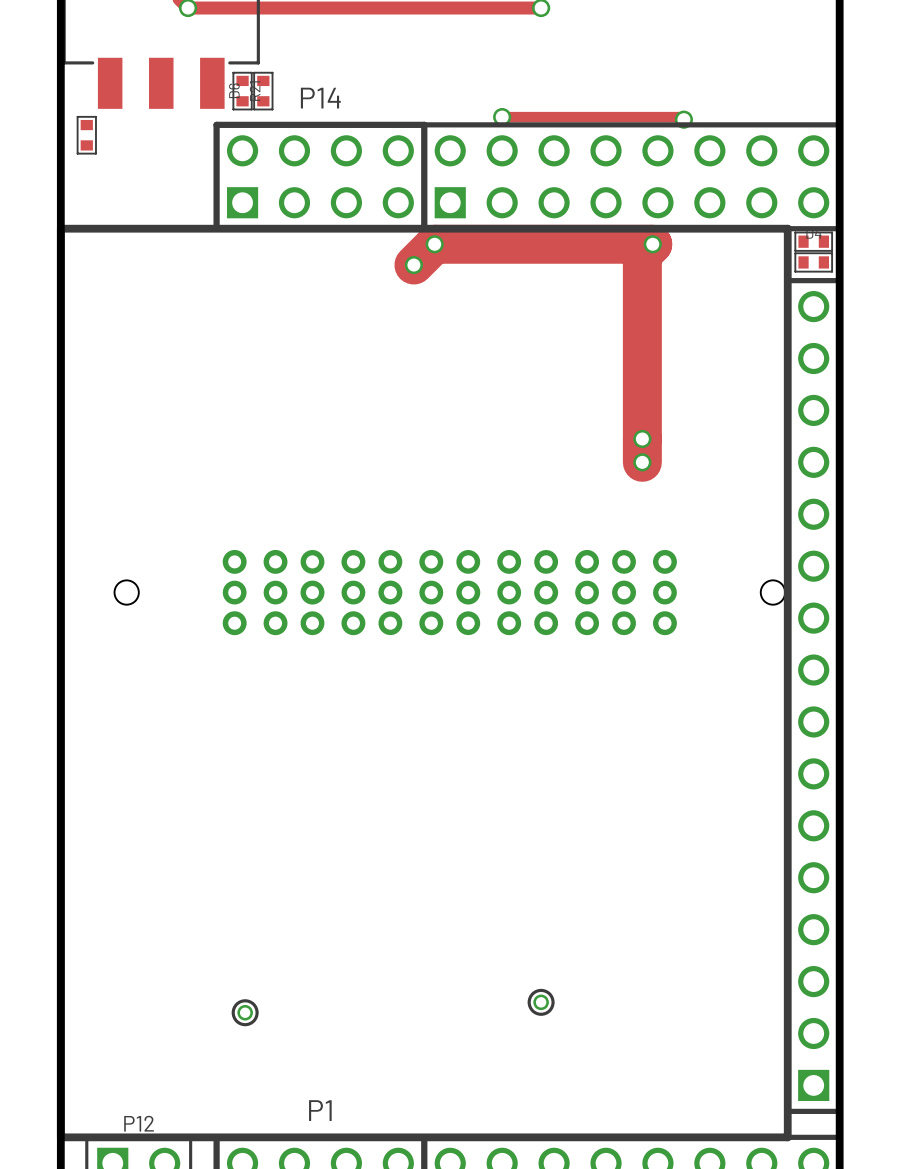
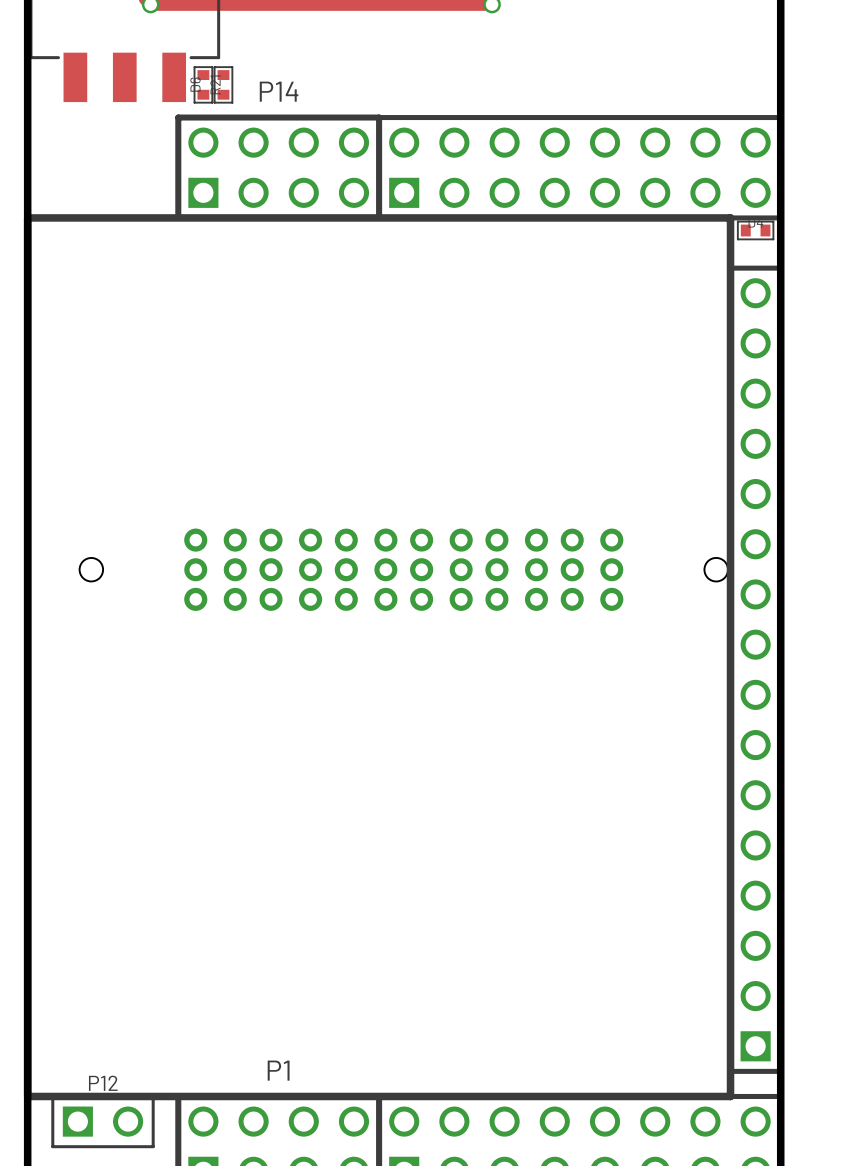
track: (502, 117) (681, 117) (683, 119) -> none
via: (502, 117) -> none
via: (683, 119) -> none
part: (86, 135) -> none
via: (434, 244) -> none
via: (652, 244) -> none
part: (813, 262) -> none
track: (413, 265) (434, 244) (652, 244) (642, 254) (642, 462) -> none
via: (413, 265) -> none
via: (642, 438) -> none
via: (642, 462) -> none
part: (541, 1002) -> none
part: (245, 1012) -> none

